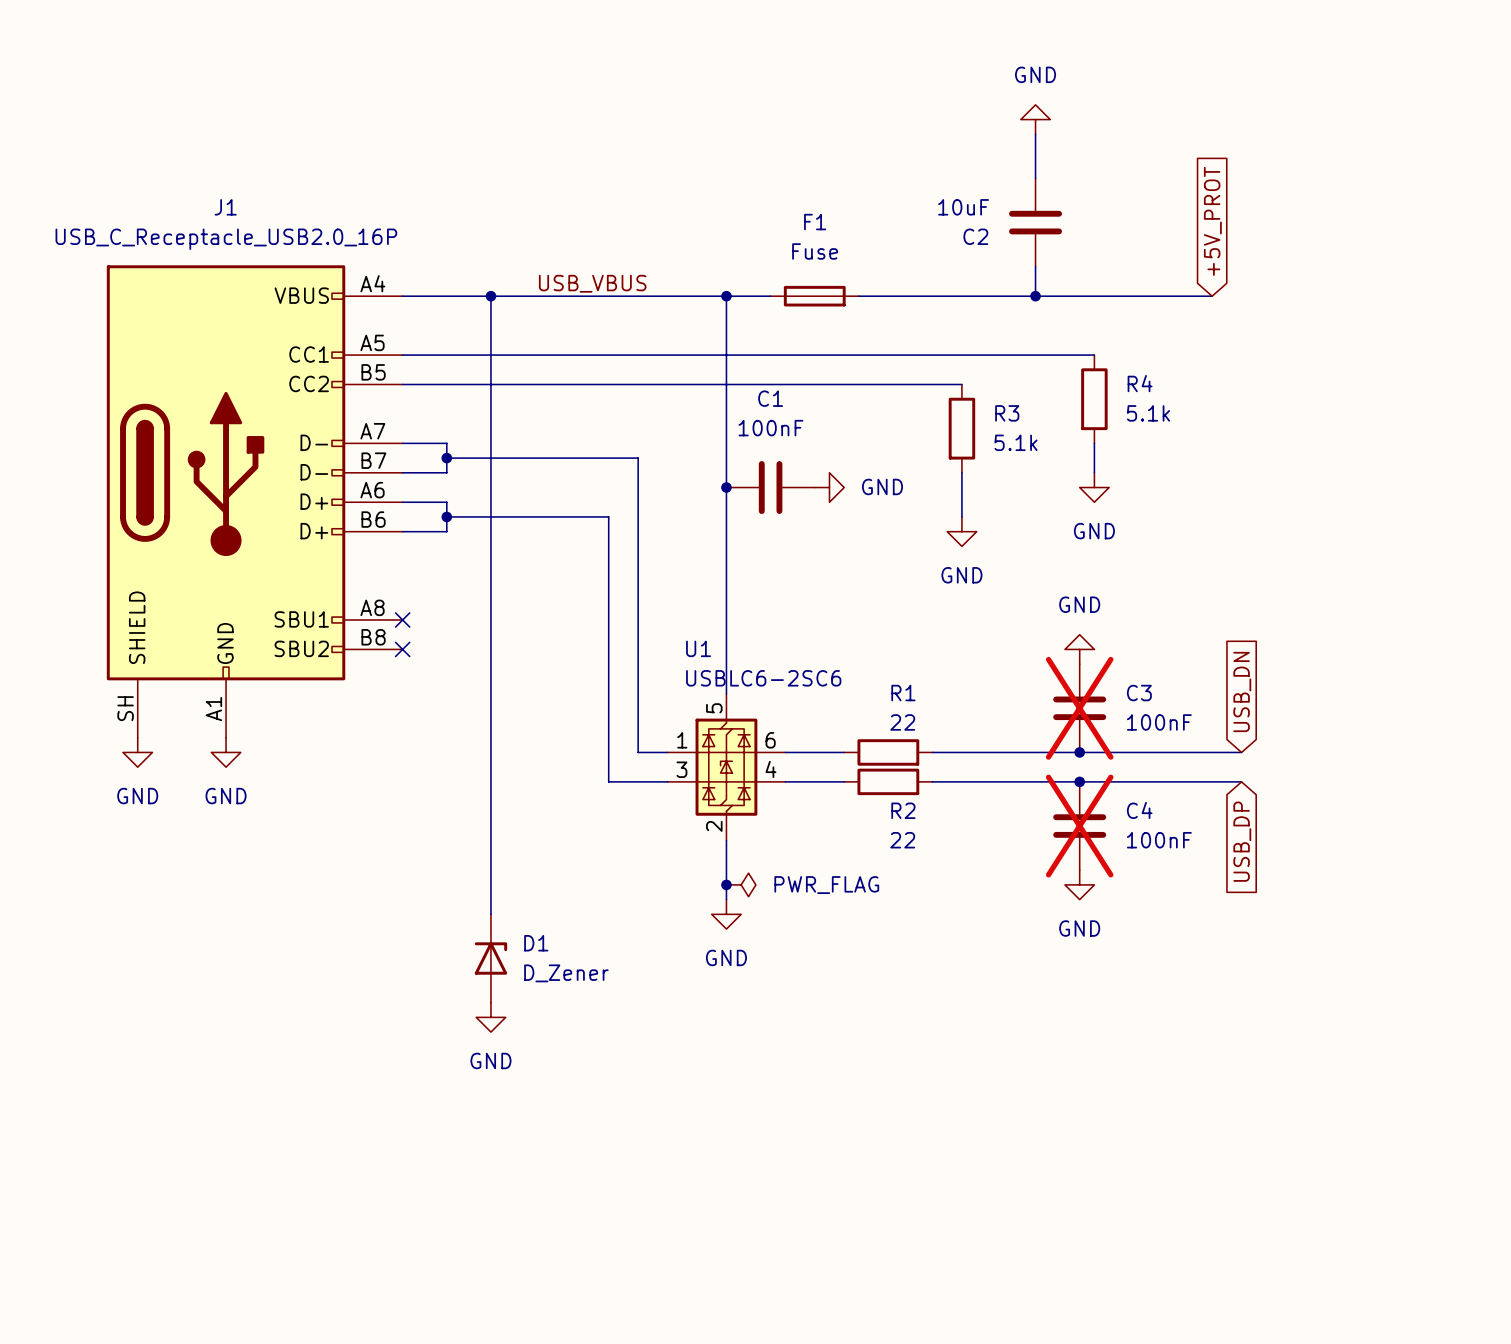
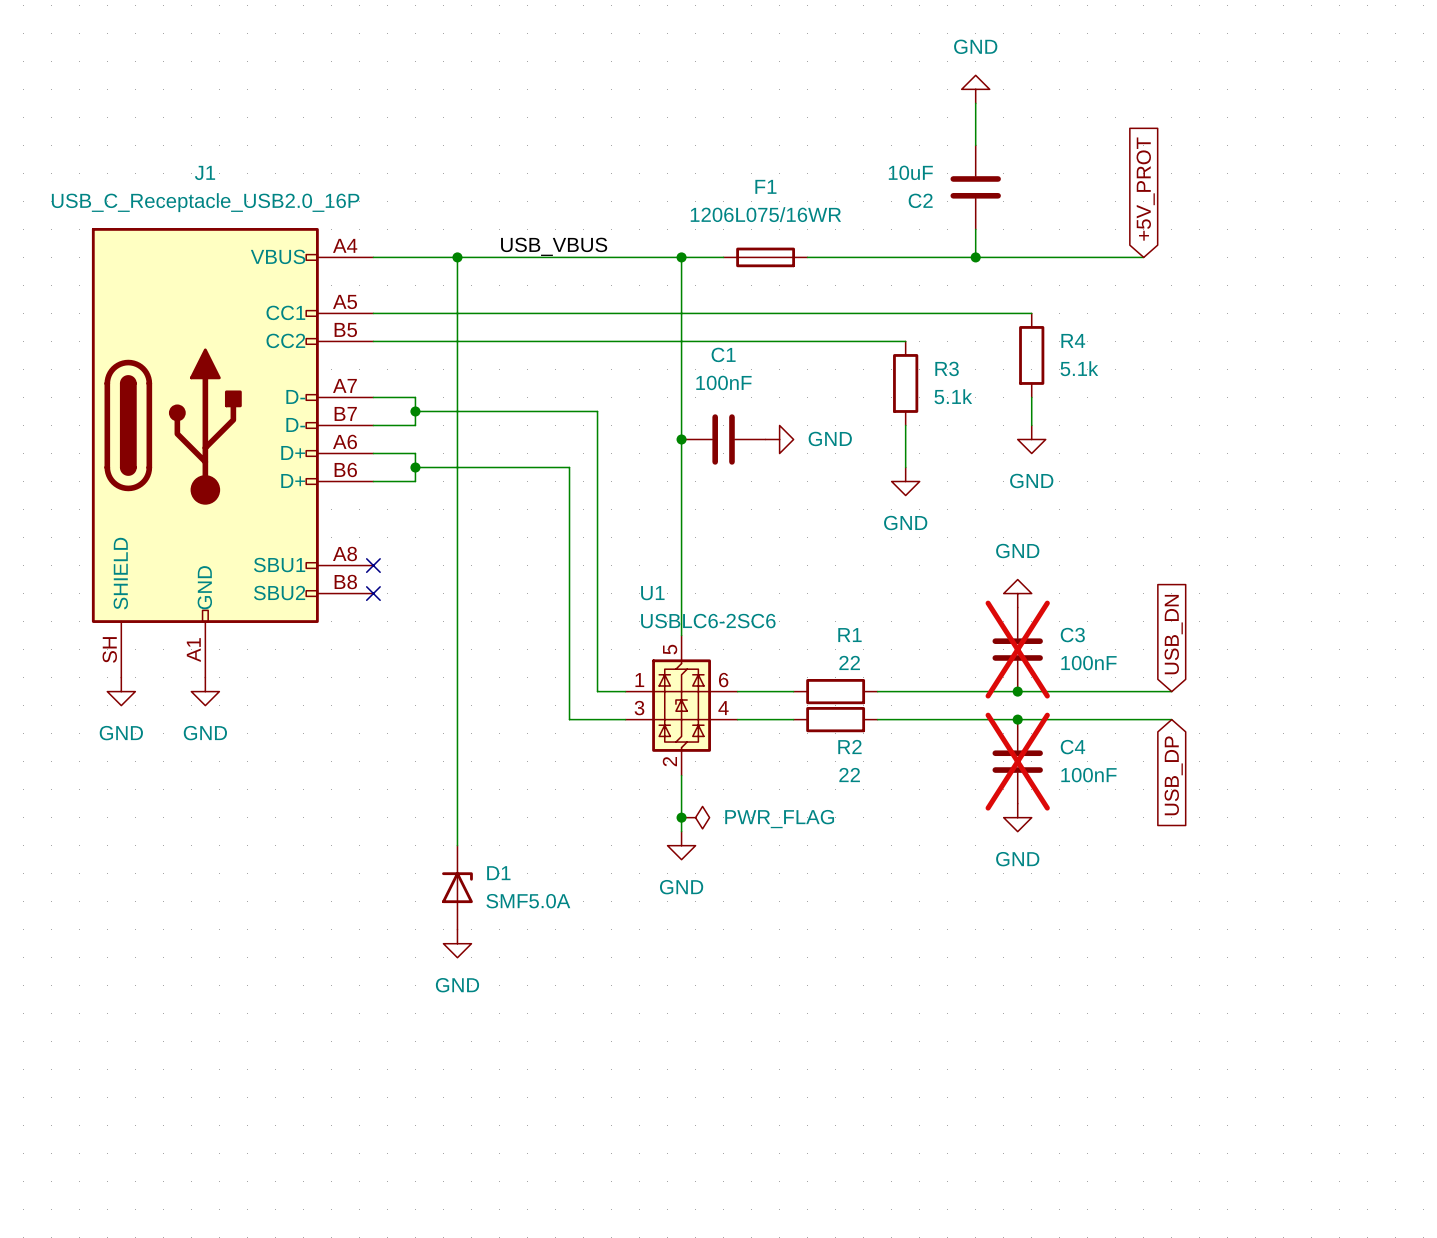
F1 value: Fuse (815, 251) -> 1206L075/16WR (765, 214)
D1 value: D_Zener (566, 973) -> SMF5.0A (528, 901)

